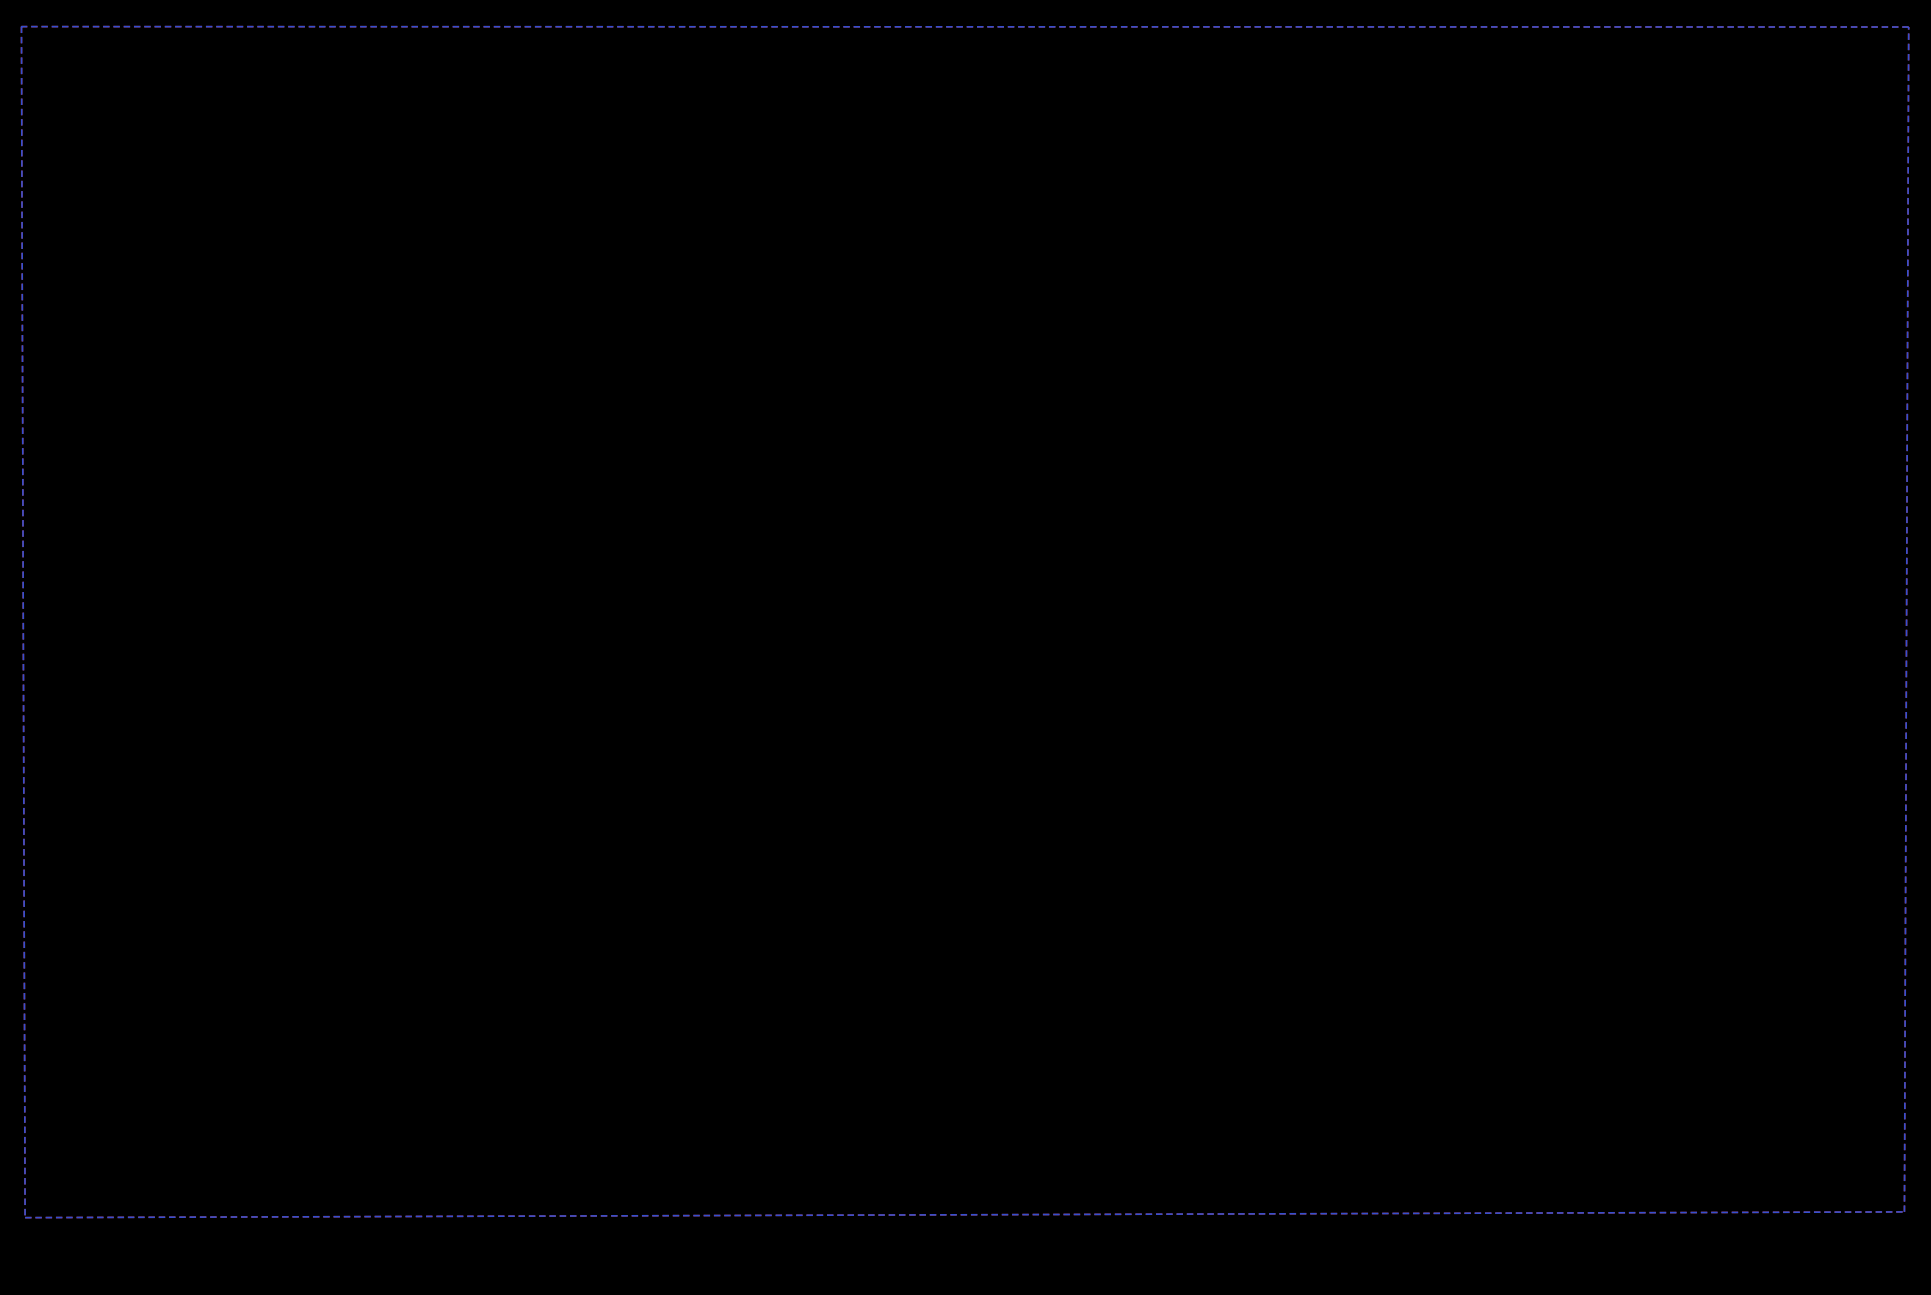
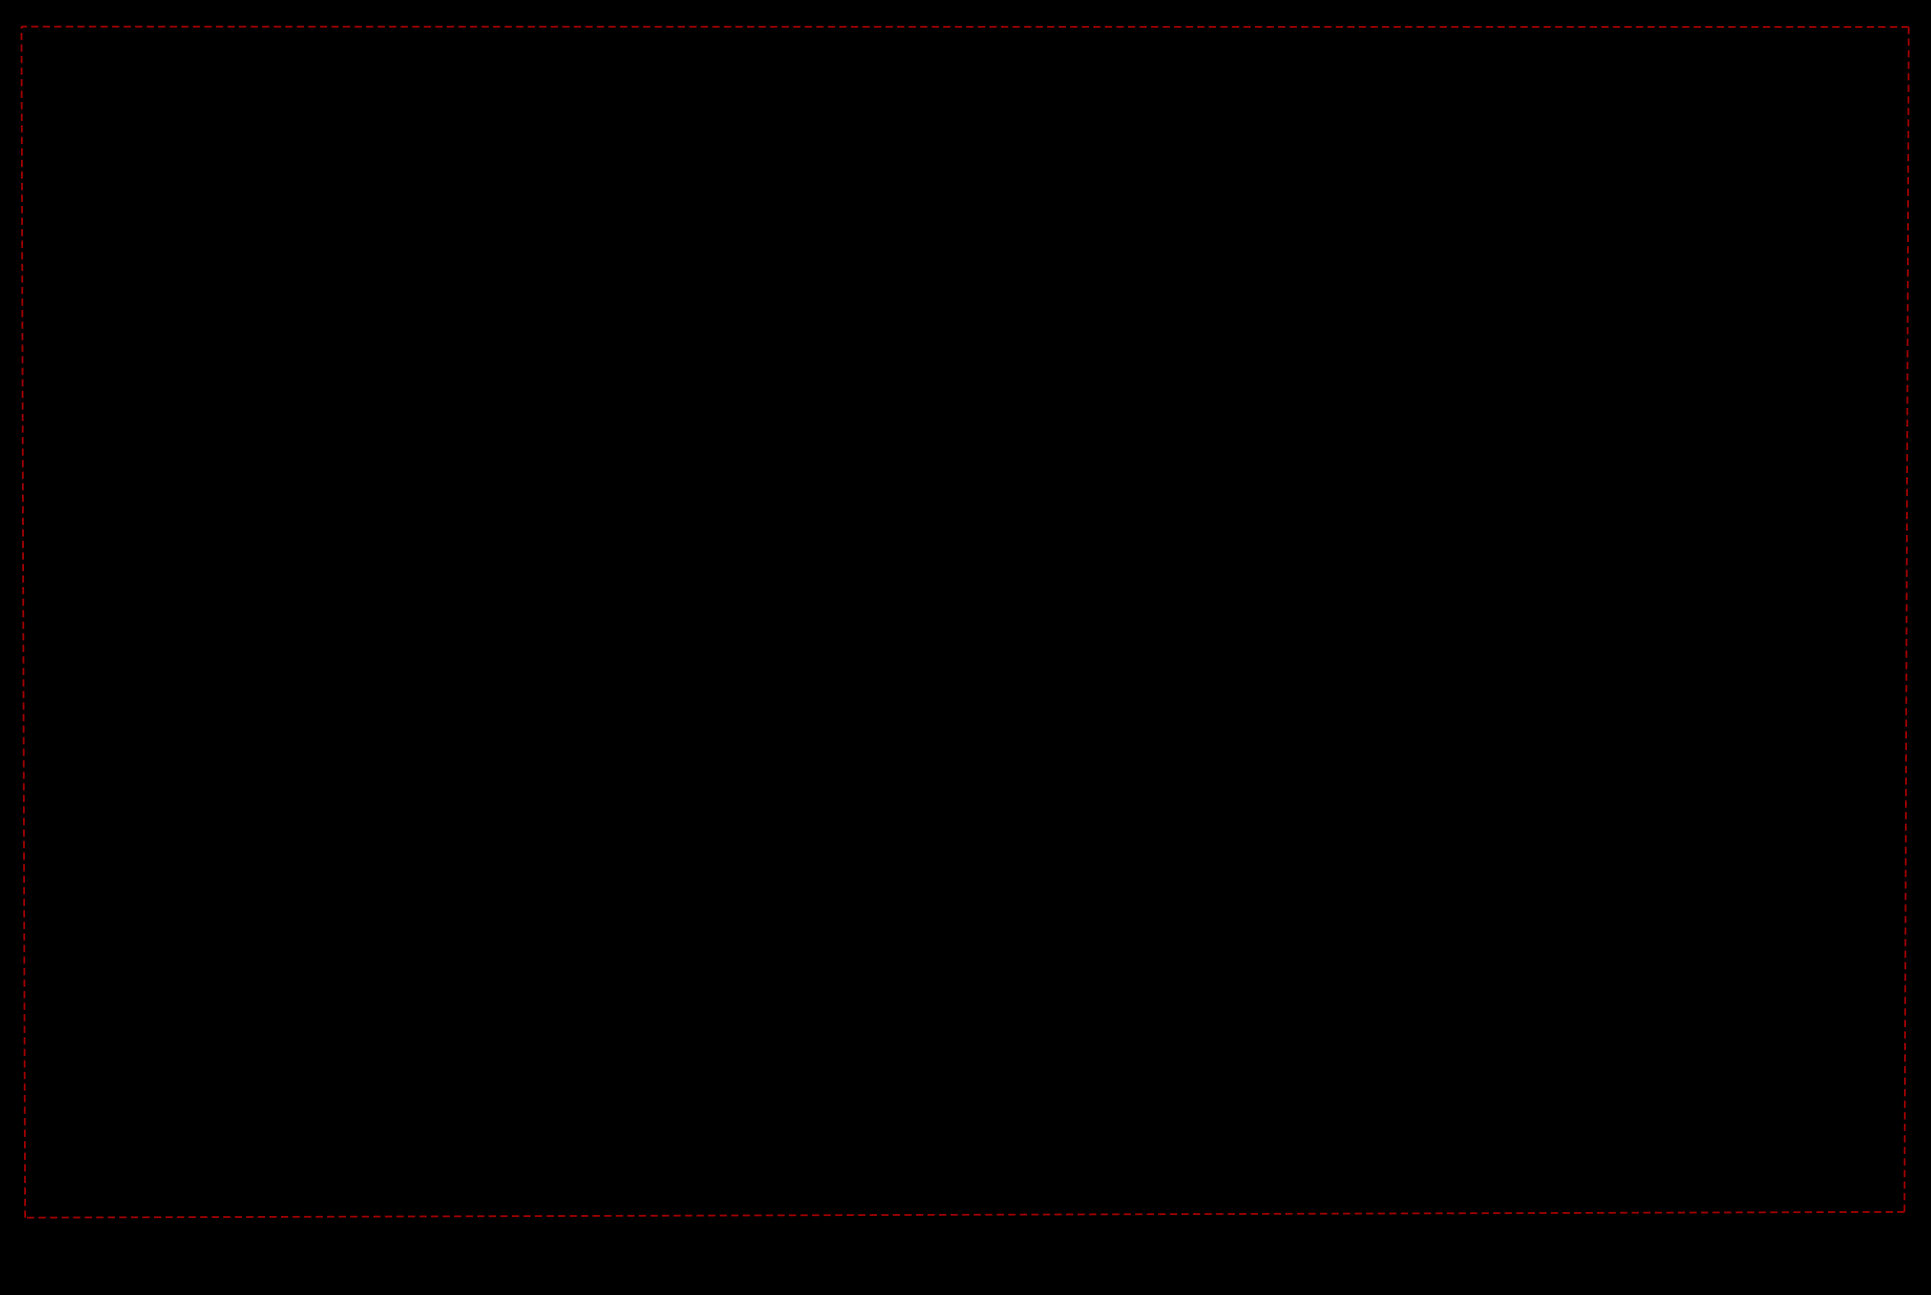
bottom zone outline: (21, 26) (1908, 27) (1904, 1211) (25, 1217) (21, 26) -> none

